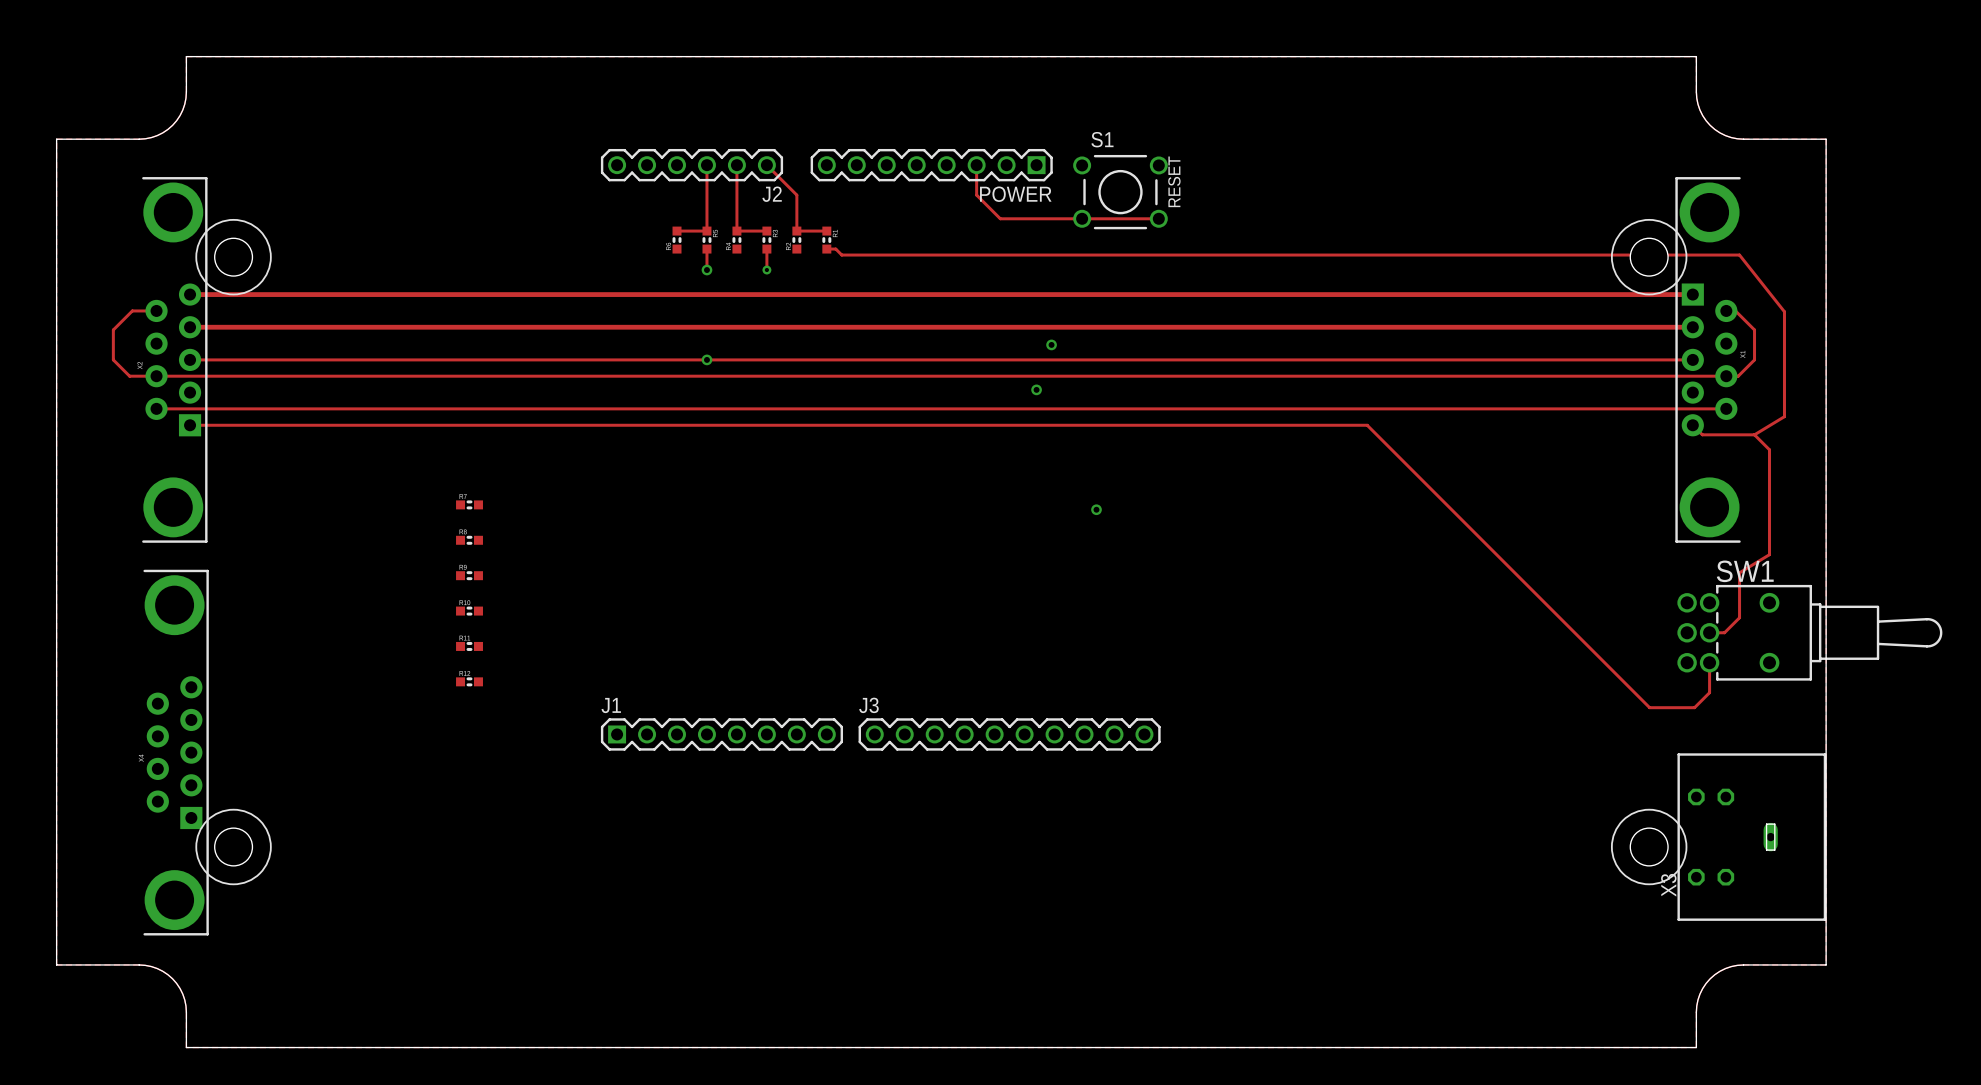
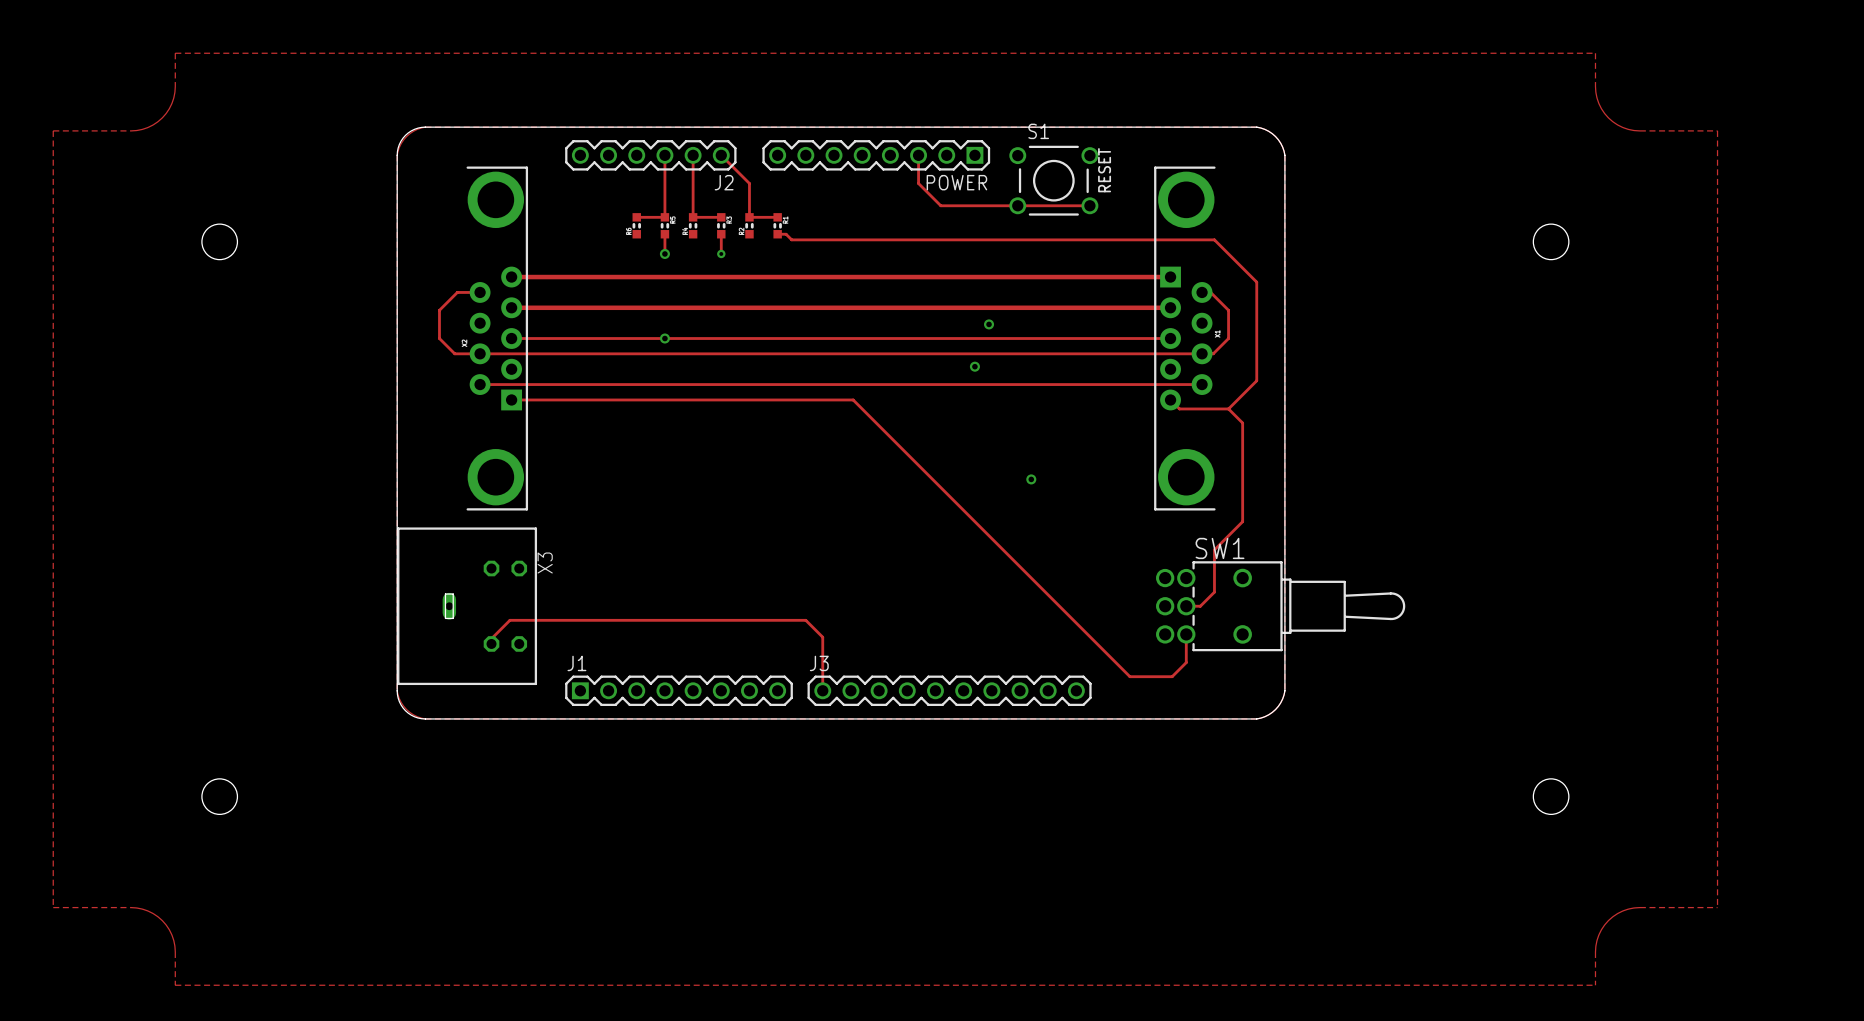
board edge: (186, 56) (1696, 56) (1697, 104) (1706, 120) (1719, 132) (1731, 137) (1743, 139) (1826, 139) (1826, 964) (1743, 964) (1731, 966) (1719, 971) (1706, 983) (1697, 999) (1696, 1047) (186, 1047) (184, 999) (176, 983) (162, 971) (151, 966) (139, 964) (56, 964) (56, 139) (139, 139) (151, 137) (162, 132) (176, 120) (184, 104) (186, 56) -> none
board edge: none -> (425, 127) (1256, 127) (1272, 133) (1280, 143) (1284, 155) (1284, 690) (1278, 706) (1268, 714) (1256, 718) (425, 718) (408, 713) (399, 701) (397, 690) (397, 155) (399, 144) (405, 135) (414, 129) (425, 127)
zone outline: none -> (425, 127) (417, 129) (406, 136) (399, 147) (397, 155) (397, 690) (401, 702) (409, 712) (425, 718) (1256, 718) (1268, 714) (1278, 706) (1284, 690) (1284, 155) (1280, 143) (1272, 133) (1256, 127) (425, 127)
drawing: [195, 218, 272, 296] -> none
drawing: [1610, 218, 1688, 296] -> none
track: (1291, 255) (1739, 255) (1784, 311) (1784, 416) (1754, 434) -> (1214, 239) (1256, 282) (1256, 380) (1228, 408)
track: (190, 294) (543, 294) -> none
track: (1244, 294) (1692, 294) -> none
track: (156, 310) (132, 310) (113, 329) (113, 359) (129, 376) (483, 376) -> (480, 292) (457, 292) (439, 310) (439, 338) (454, 353)
track: (1726, 310) (1735, 310) (1754, 329) (1754, 359) (1738, 376) (1289, 376) -> (1202, 292) (1210, 292) (1228, 310) (1228, 338) (1213, 353)
track: (190, 327) (543, 327) -> none
track: (1244, 327) (1692, 327) -> none
part position: (174, 359) -> (497, 338)
track: (190, 359) (543, 359) -> none
track: (1244, 359) (1692, 359) -> none
part position: (1708, 359) -> (1184, 338)
track: (156, 408) (510, 408) -> none
track: (1278, 408) (1726, 408) -> none
track: (190, 425) (543, 425) -> none
track: (907, 425) (1367, 425) (1649, 707) (1694, 707) (1709, 692) (1709, 662) -> (853, 399) (1129, 676) (1172, 676) (1186, 662) (1186, 634)
track: none -> (1170, 399) (1179, 408) (1228, 408)
track: (1692, 425) (1702, 434) (1754, 434) -> none
track: none -> (1228, 408) (1242, 423) (1242, 521) (1214, 549) (1214, 592) (1200, 606) (1186, 606)
track: (1754, 434) (1769, 449) (1769, 554) (1739, 572) (1739, 617) (1724, 632) (1709, 632) -> none
part: (469, 504) -> none
part: (469, 540) -> none
part: (469, 575) -> none
part: (469, 611) -> none
SW1 position: (1809, 632) -> (1280, 606)
part: (469, 646) -> none
part: (469, 681) -> none
track: none -> (491, 643) (491, 638) (509, 620) (805, 620) (822, 637) (822, 690)
part: (176, 752) -> none
drawing: [195, 808, 272, 886] -> none
drawing: [1610, 808, 1688, 886] -> none
X3 rotation: 0° (1751, 837) -> 180° (467, 606)
X3 position: (1751, 837) -> (467, 606)

